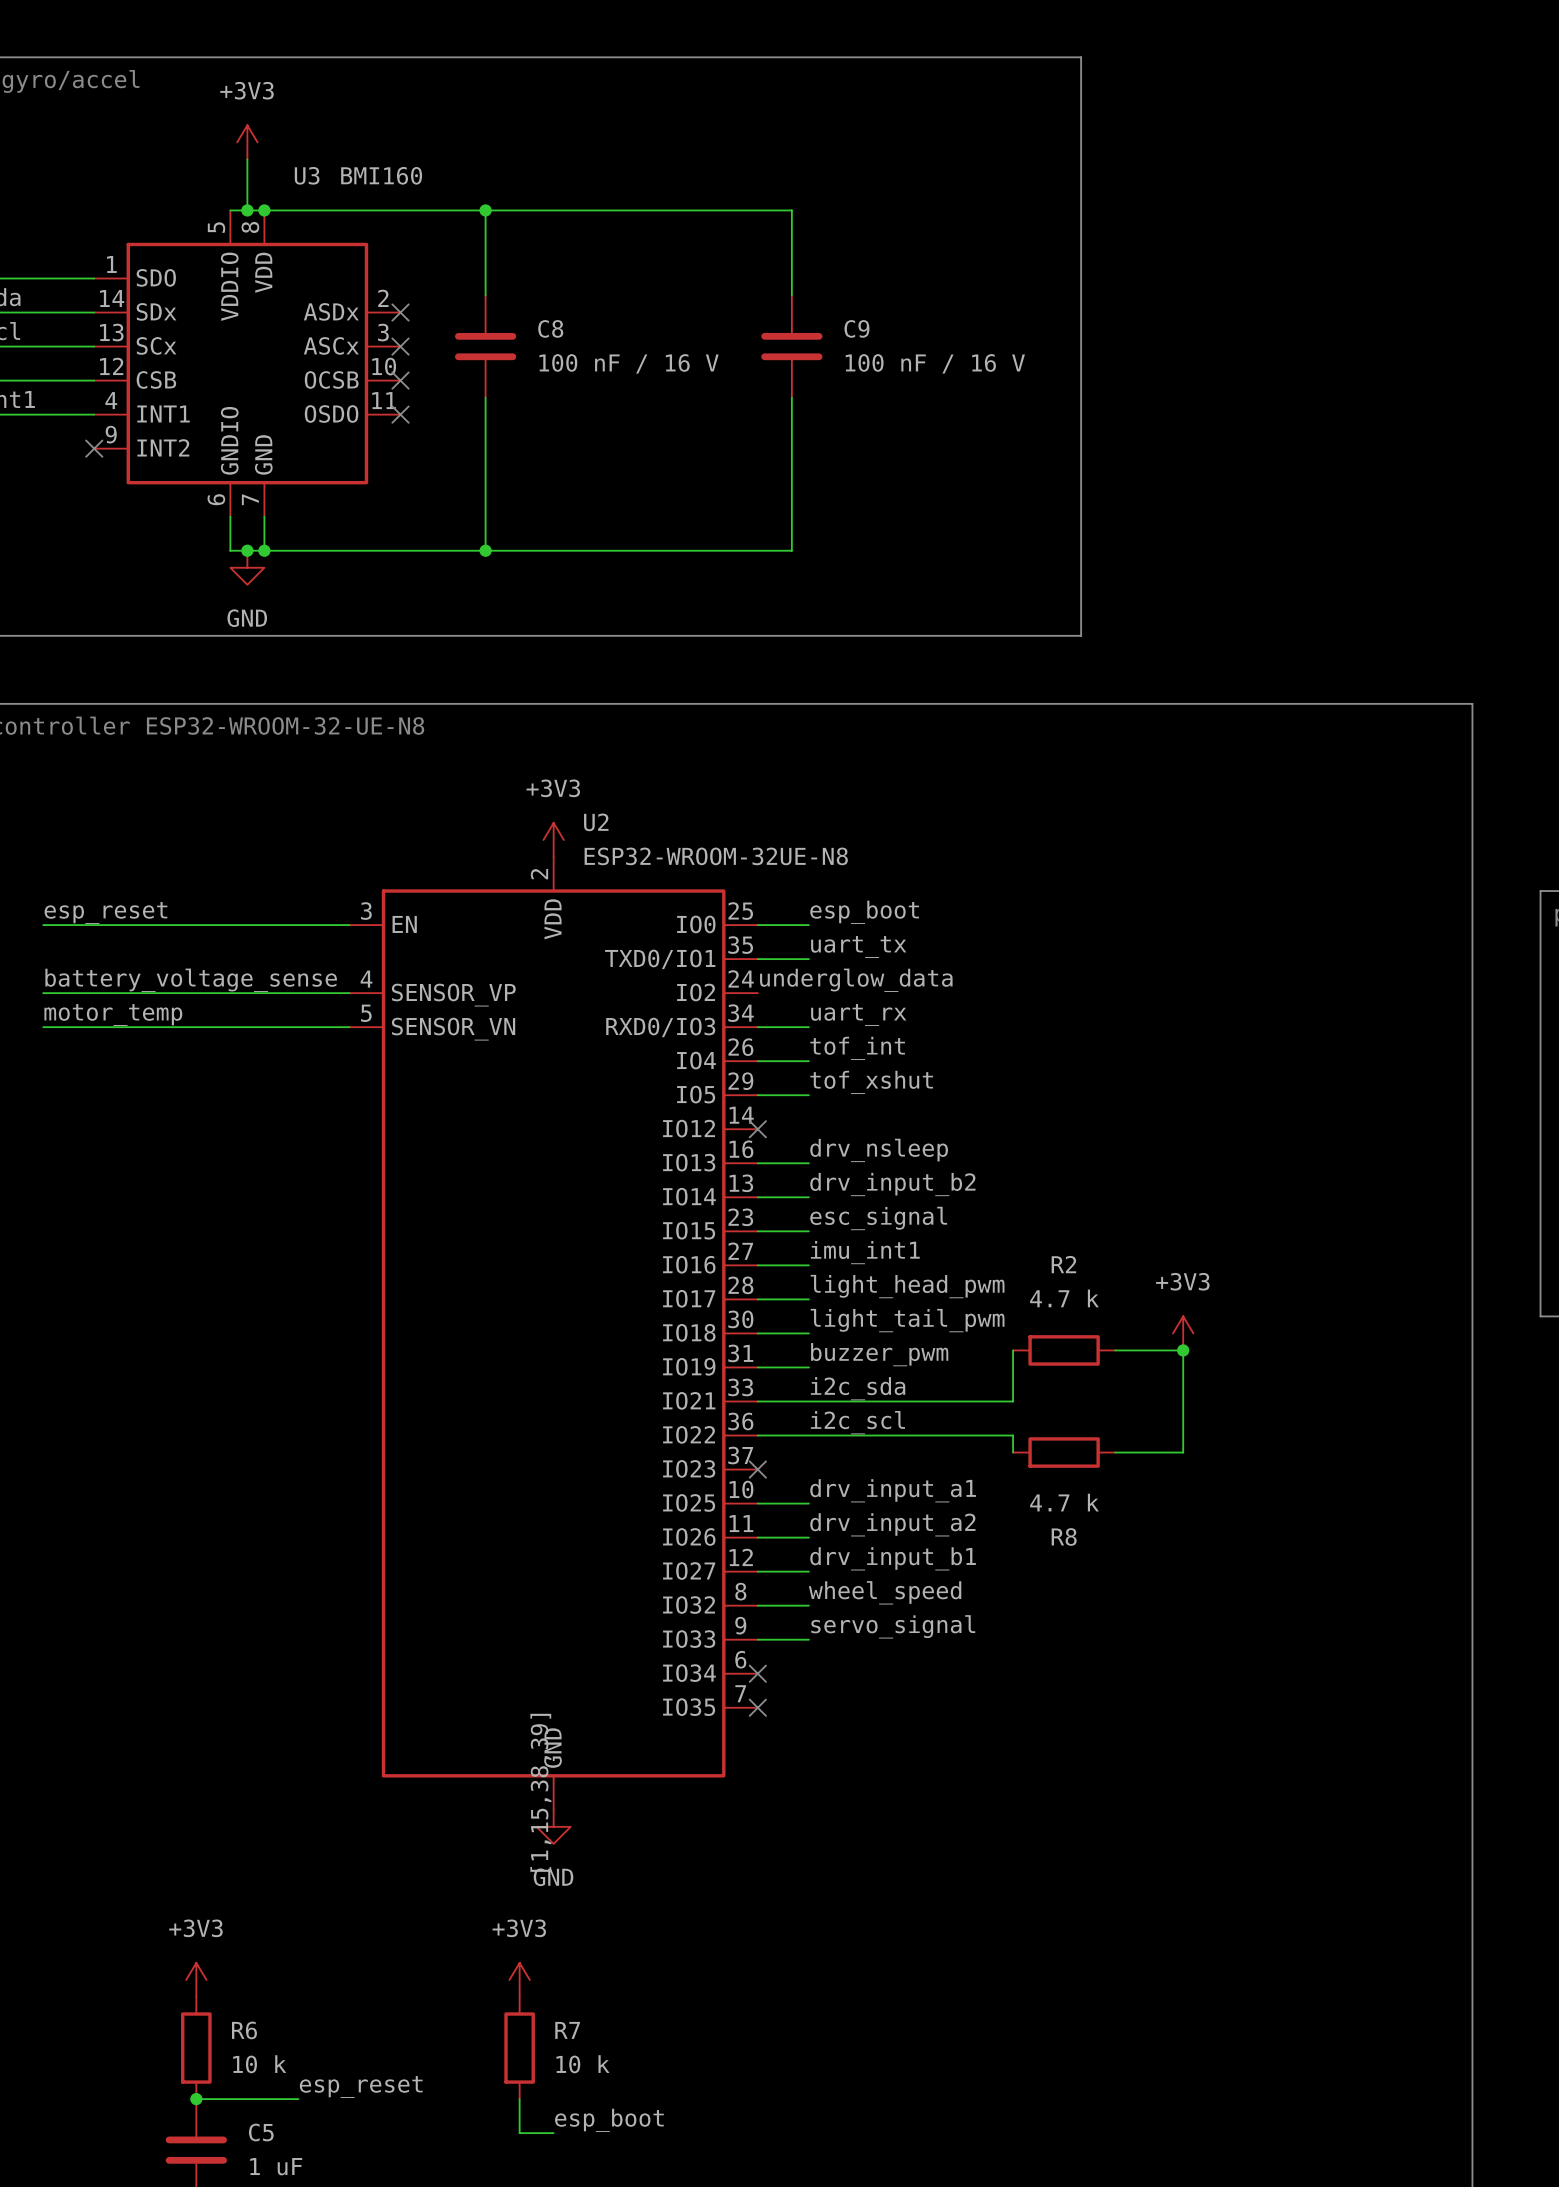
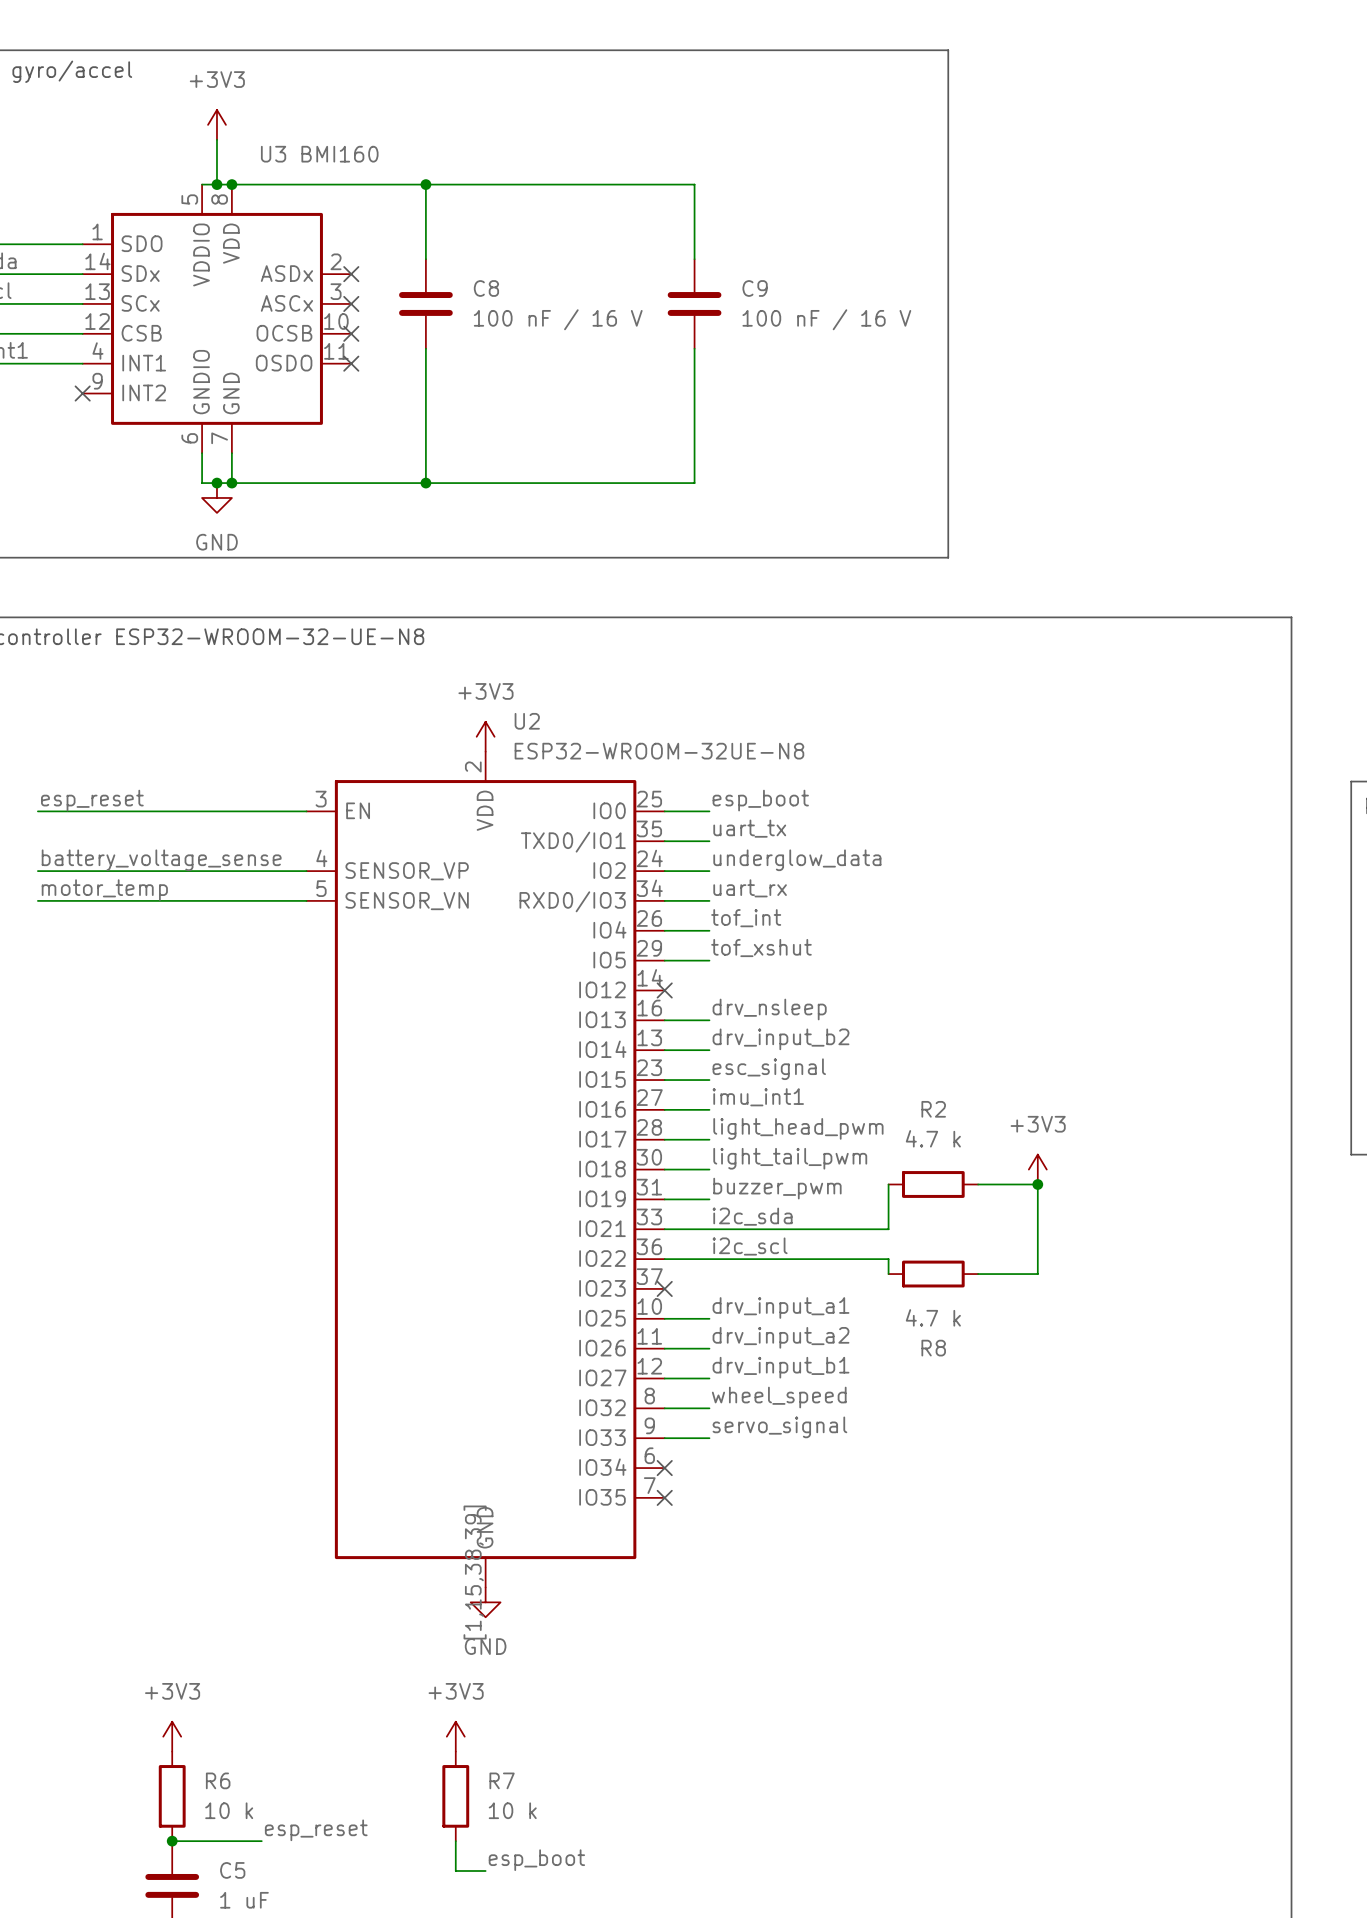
label position: underglow_data (856, 980) -> underglow_data (797, 860)
wire: none -> (664, 871) (709, 871)

